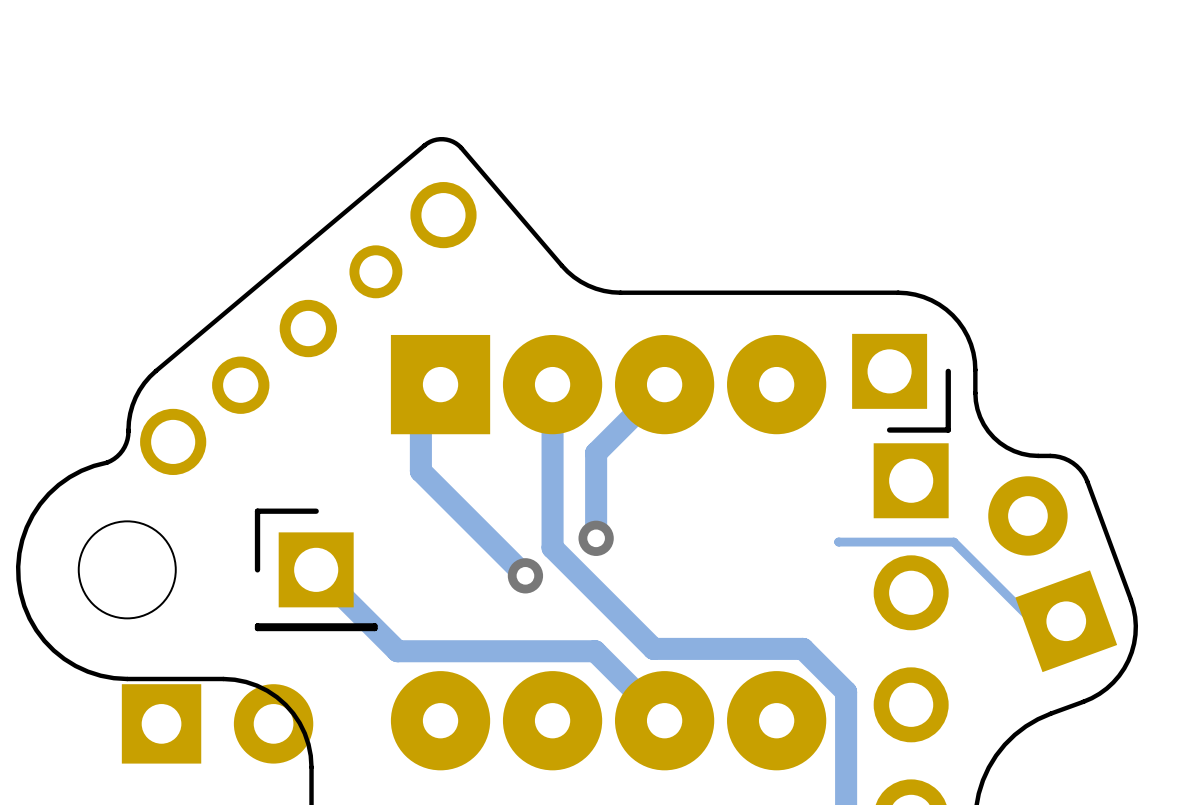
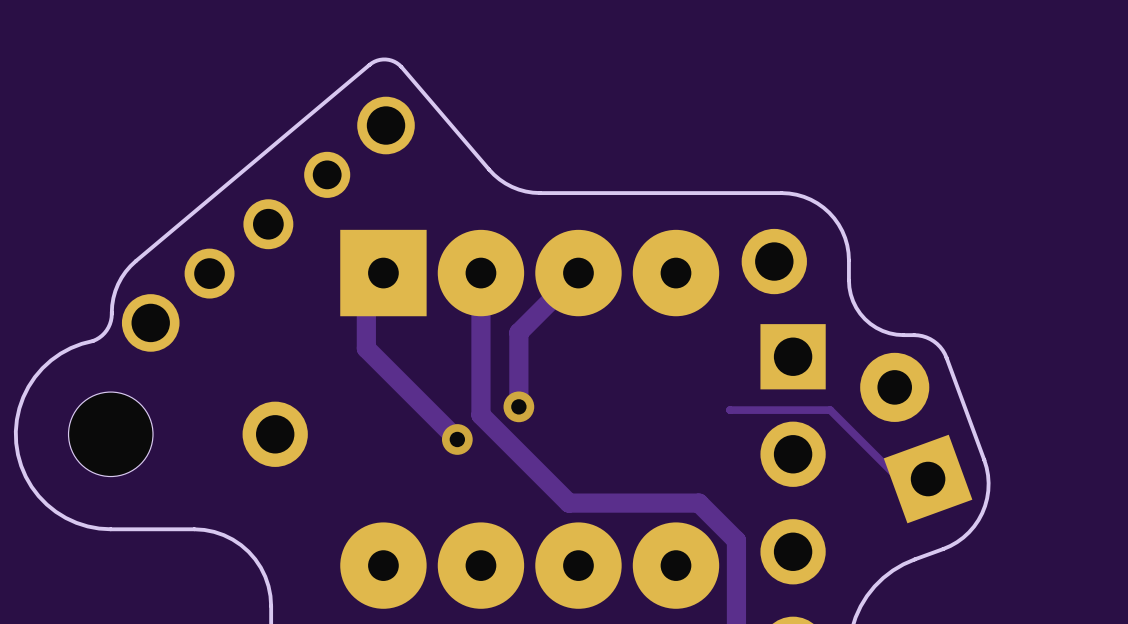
part footprint: [852, 333, 951, 433] -> [741, 228, 807, 295]
part footprint: [254, 508, 378, 632] -> [242, 401, 308, 467]
track: (316, 569) (397, 651) (595, 651) (664, 720) -> none
part: (217, 723) -> none

